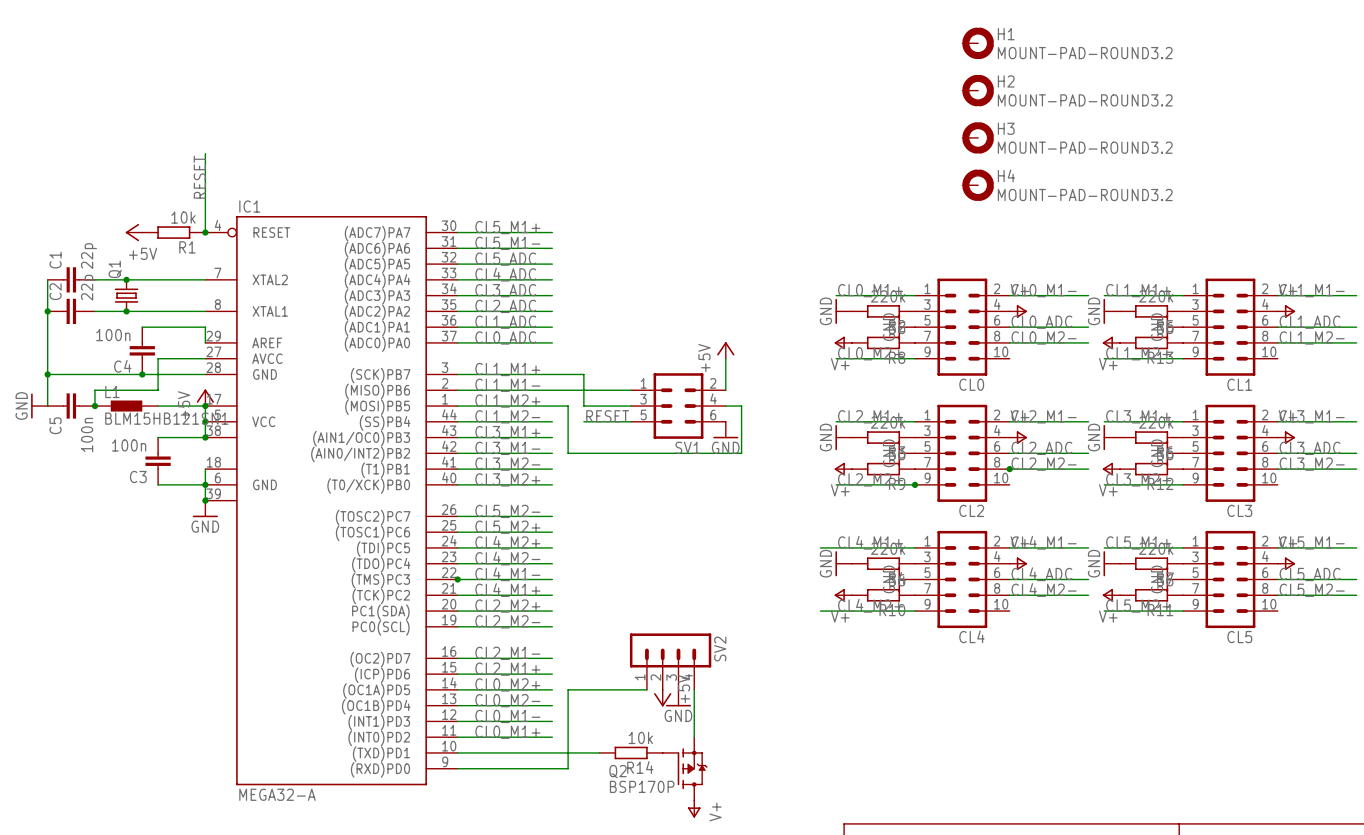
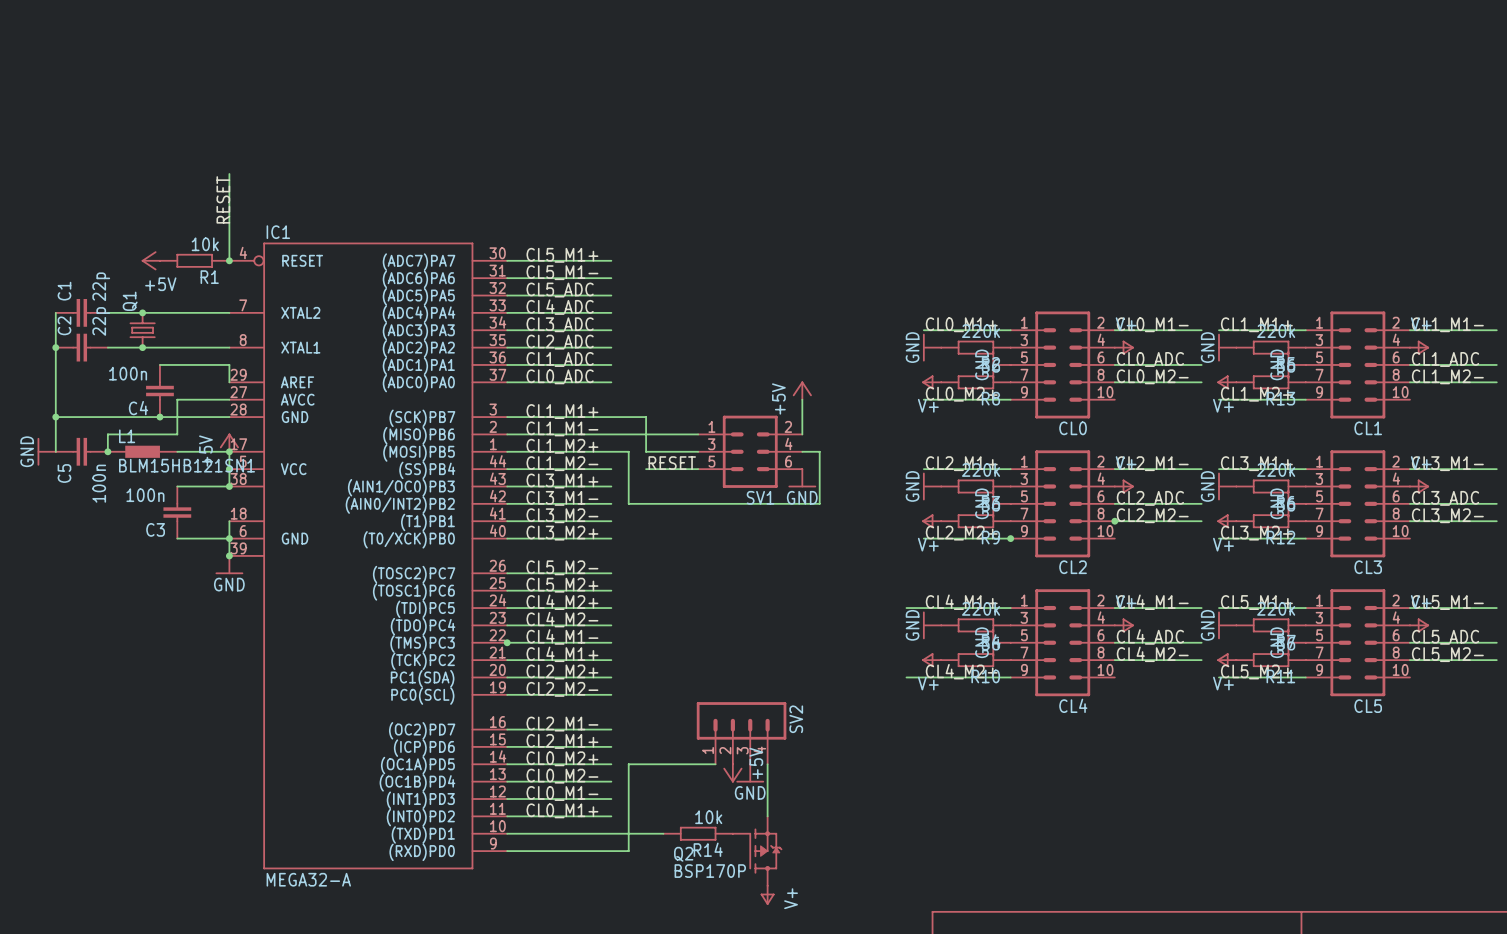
H1: MOUNT-PAD-ROUND3.2 (978, 43) -> none
H2: MOUNT-PAD-ROUND3.2 (978, 90) -> none
H3: MOUNT-PAD-ROUND3.2 (978, 137) -> none
H4: MOUNT-PAD-ROUND3.2 (978, 185) -> none

